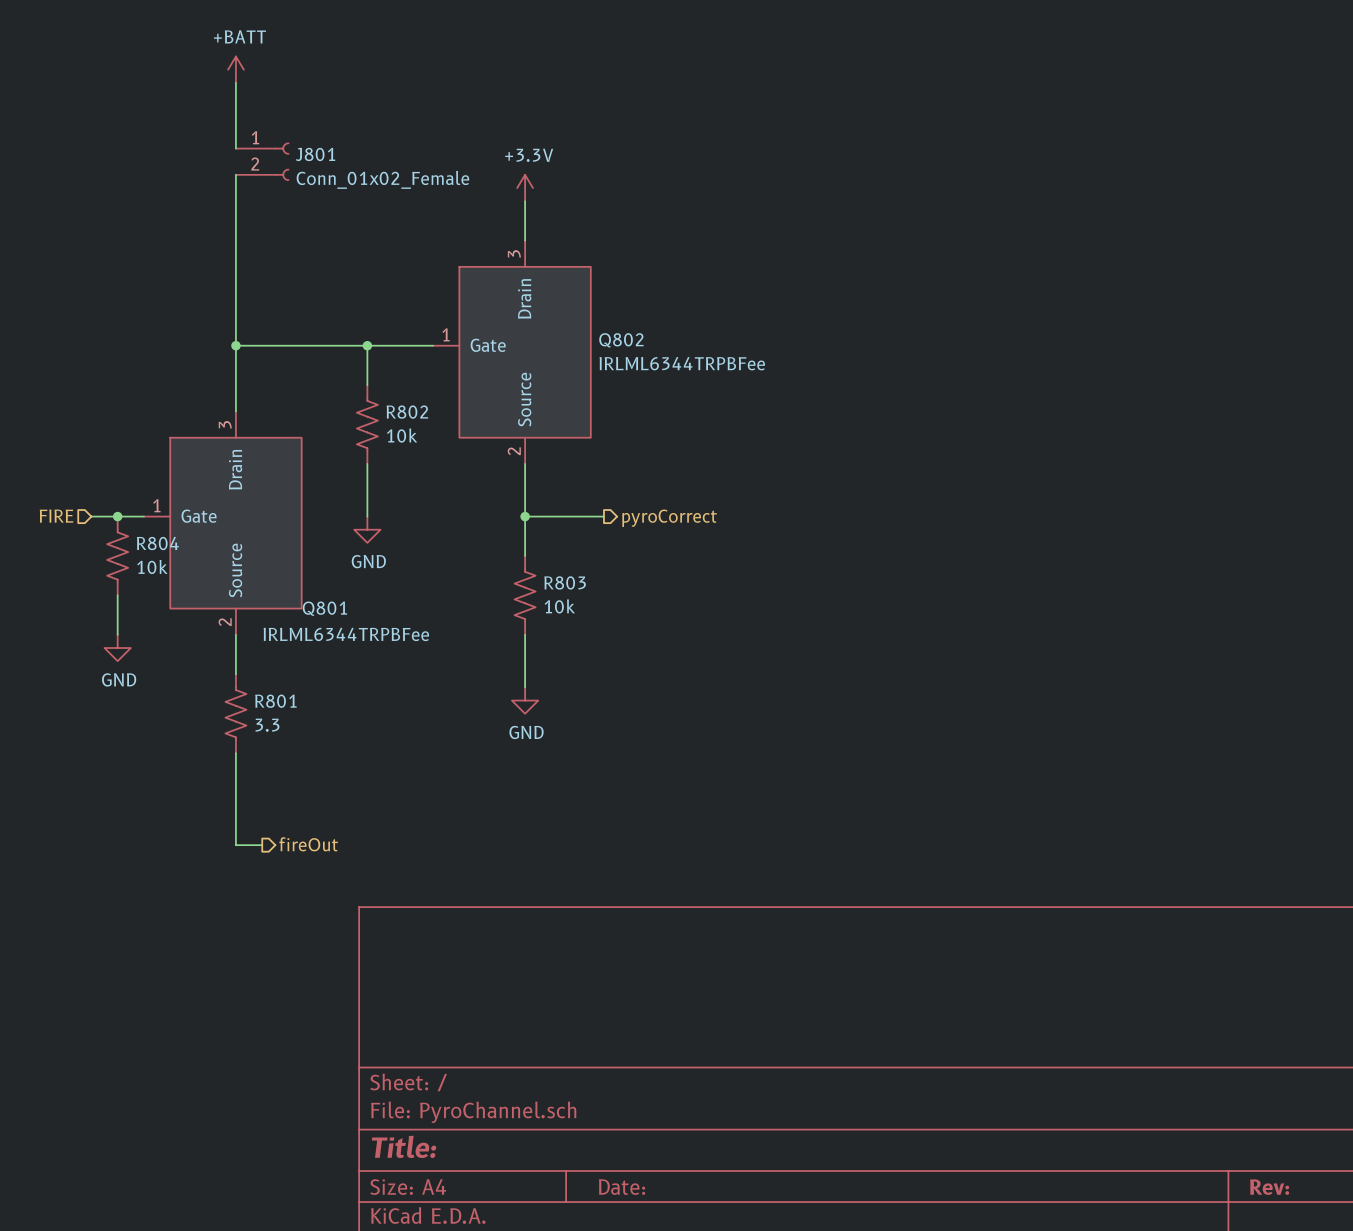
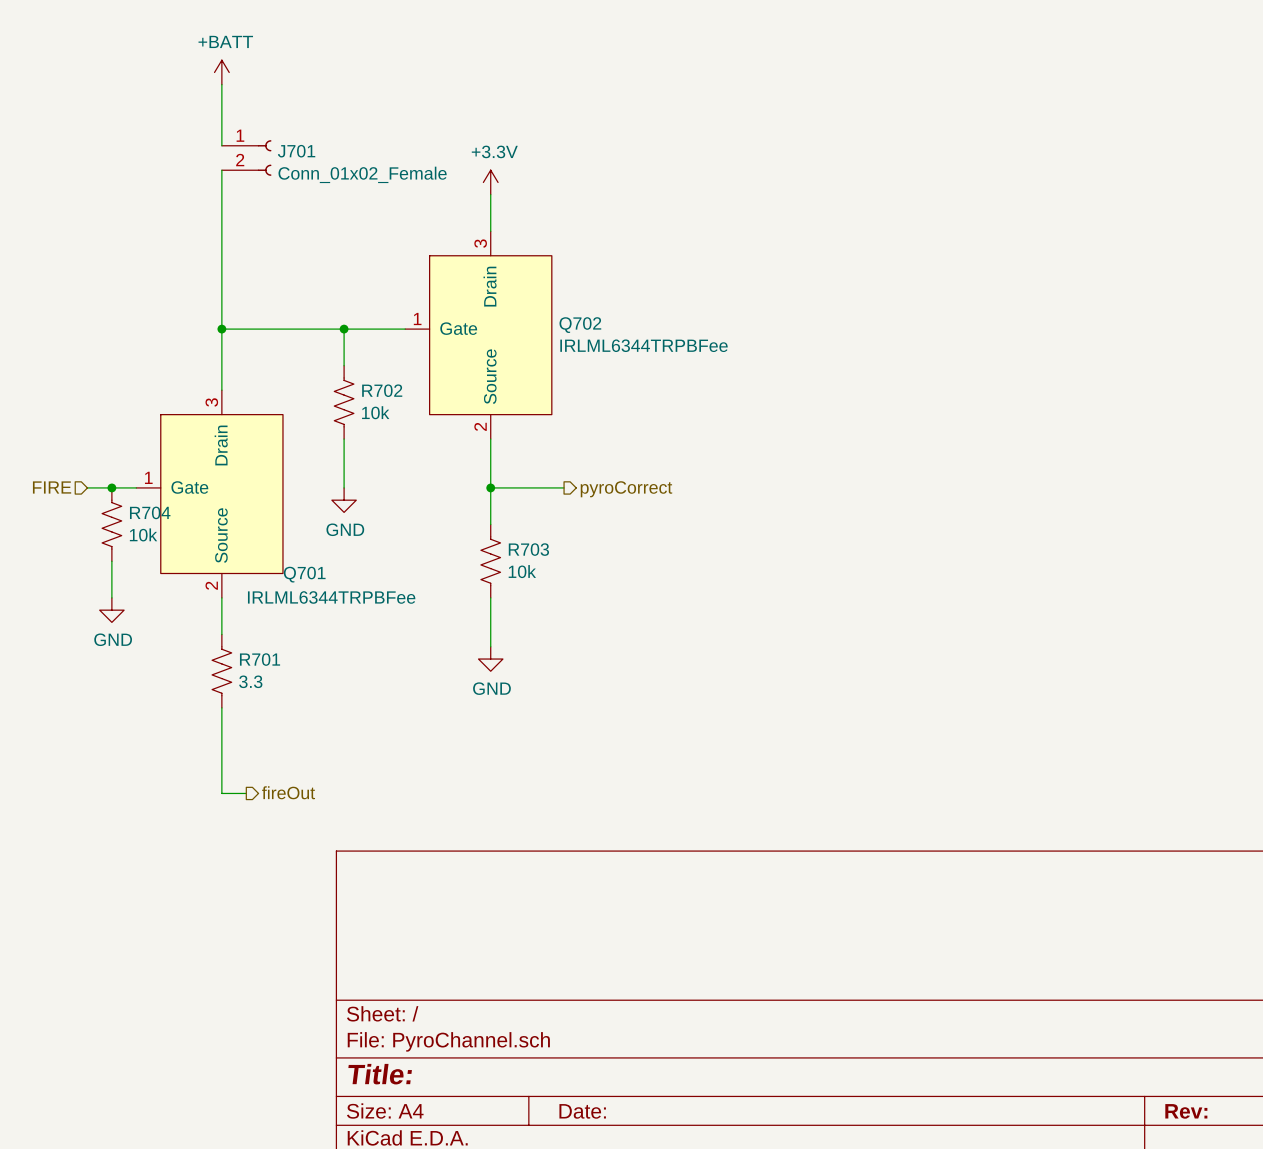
J801 name: J801 (315, 154) -> J701 (296, 151)
Q802 name: Q802 (621, 340) -> Q702 (580, 325)
R802 name: R802 (407, 412) -> R702 (382, 390)
R804 name: R804 (157, 543) -> R704 (150, 512)
R803 name: R803 (565, 582) -> R703 (528, 549)
Q801 name: Q801 (324, 608) -> Q701 (304, 574)
R801 name: R801 (275, 701) -> R701 (260, 659)

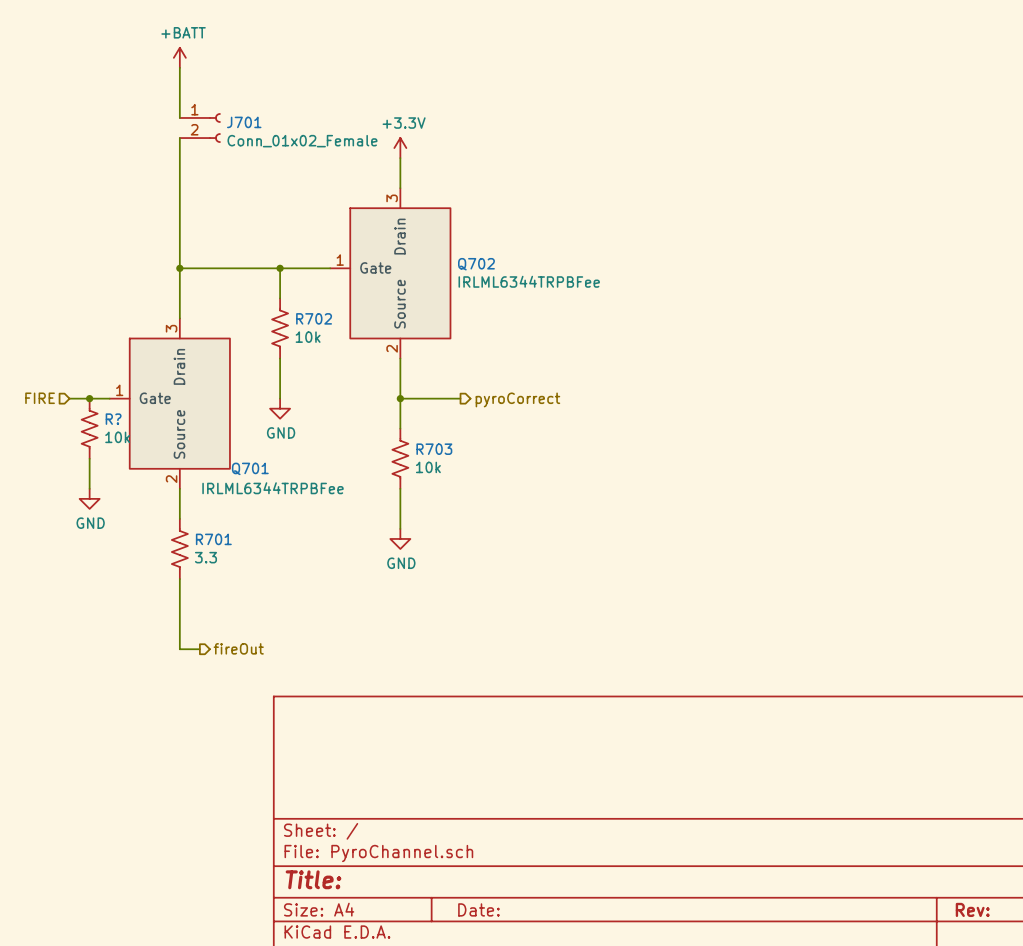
R704 name: R704 (150, 512) -> R? (113, 419)

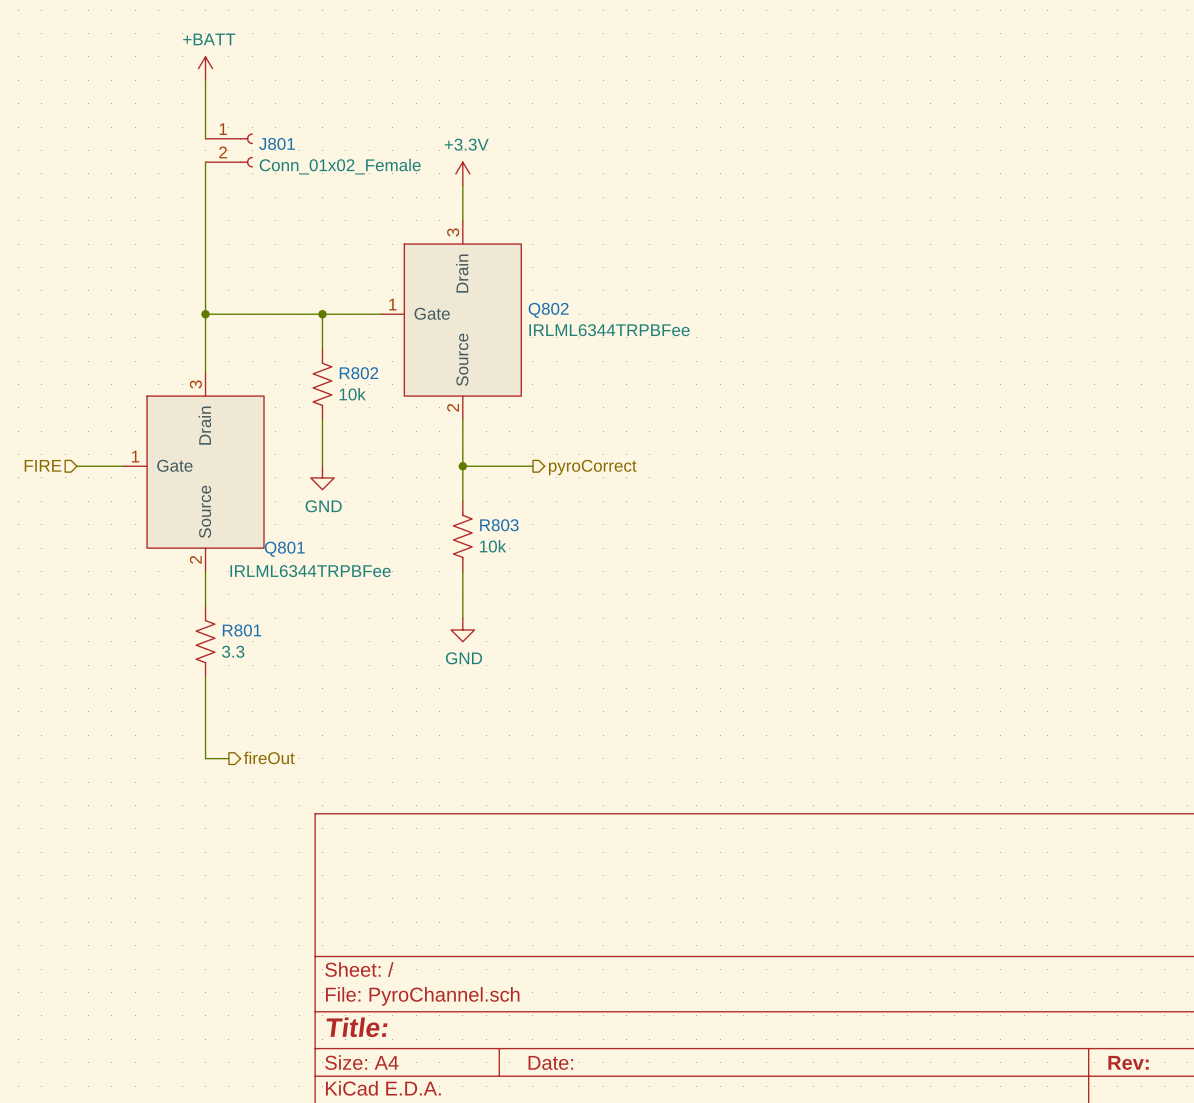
J701 name: J701 (244, 122) -> J801 (277, 143)
Q702 name: Q702 (476, 264) -> Q802 (548, 310)
R702 name: R702 (314, 318) -> R802 (358, 373)
junction: (89, 398) -> none
R?: 10k (89, 428) -> none
R703 name: R703 (434, 449) -> R803 (499, 525)
wire: (89, 458) (89, 488) -> none
Q701 name: Q701 (250, 468) -> Q801 (284, 549)
power symbol: GND (89, 498) -> none
R701 name: R701 (213, 539) -> R801 (242, 630)

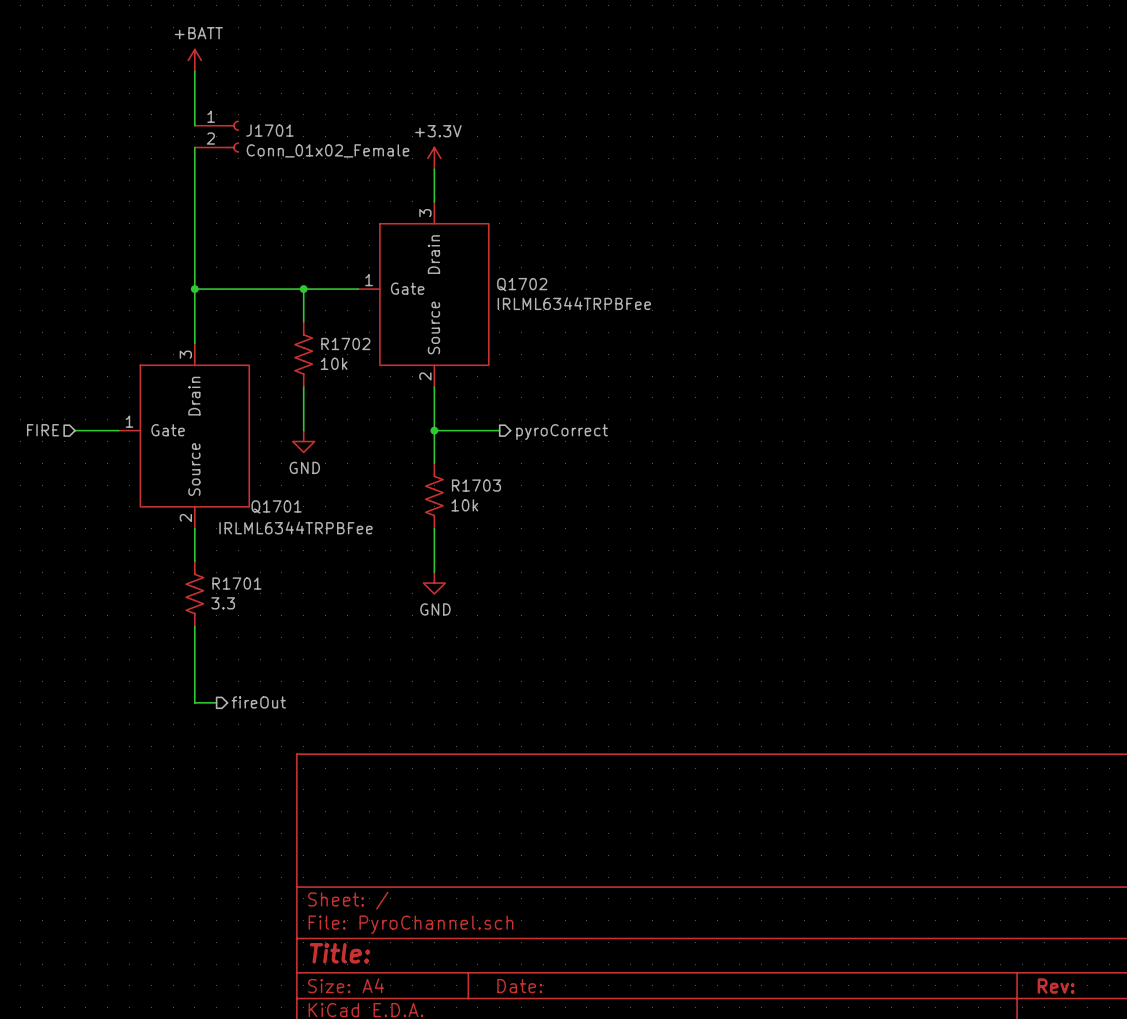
J801 name: J801 (277, 143) -> J1701 (269, 130)
Q802 name: Q802 (548, 310) -> Q1702 (522, 284)
R802 name: R802 (358, 373) -> R1702 (345, 343)
R803 name: R803 (499, 525) -> R1703 (476, 485)
Q801 name: Q801 (284, 549) -> Q1701 (276, 506)
R801 name: R801 (242, 630) -> R1701 (236, 583)

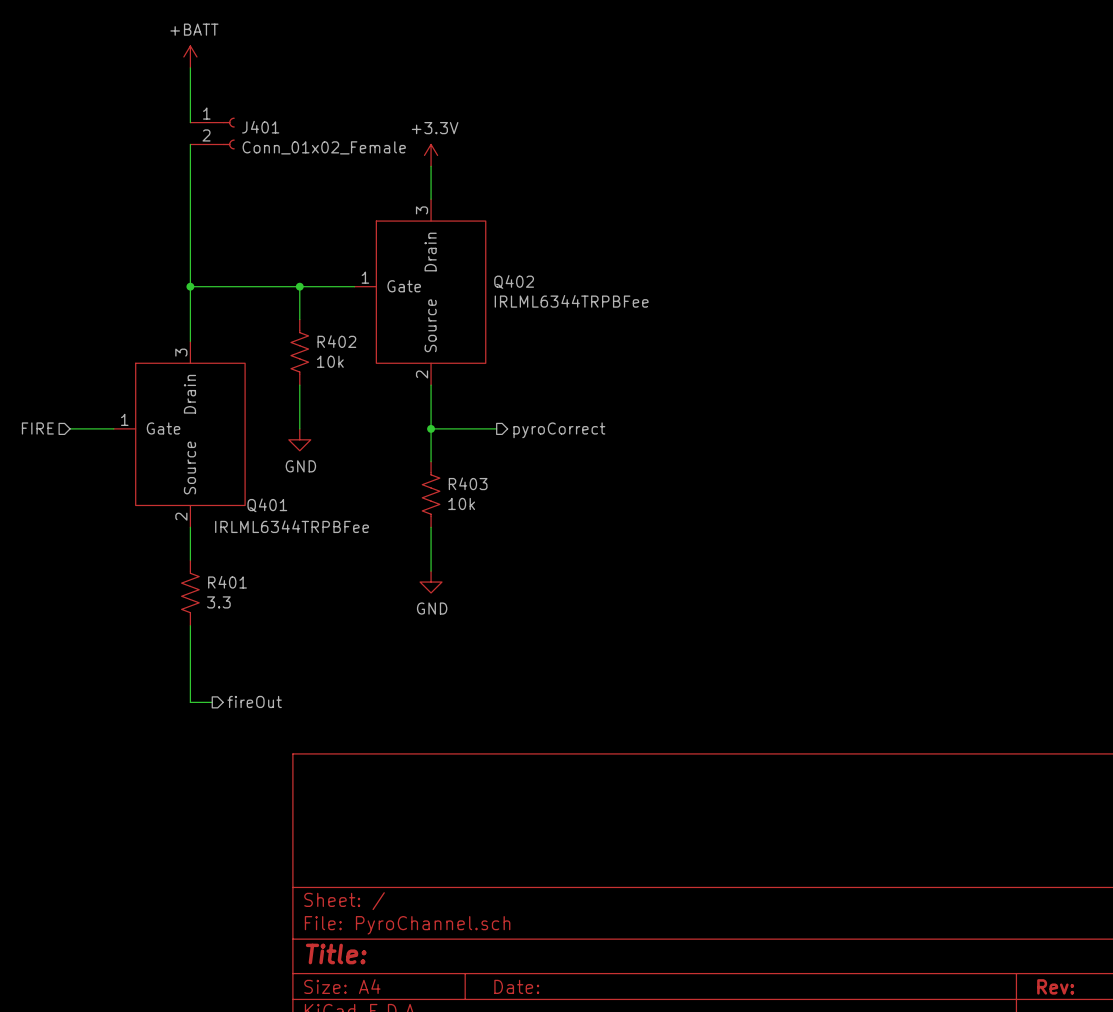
J1701 name: J1701 (269, 130) -> J401 (260, 127)
Q1702 name: Q1702 (522, 284) -> Q402 (514, 281)
R1702 name: R1702 (345, 343) -> R402 (336, 341)
R1703 name: R1703 (476, 485) -> R403 (468, 483)
Q1701 name: Q1701 (276, 506) -> Q401 (267, 505)
R1701 name: R1701 (236, 583) -> R401 (227, 582)

